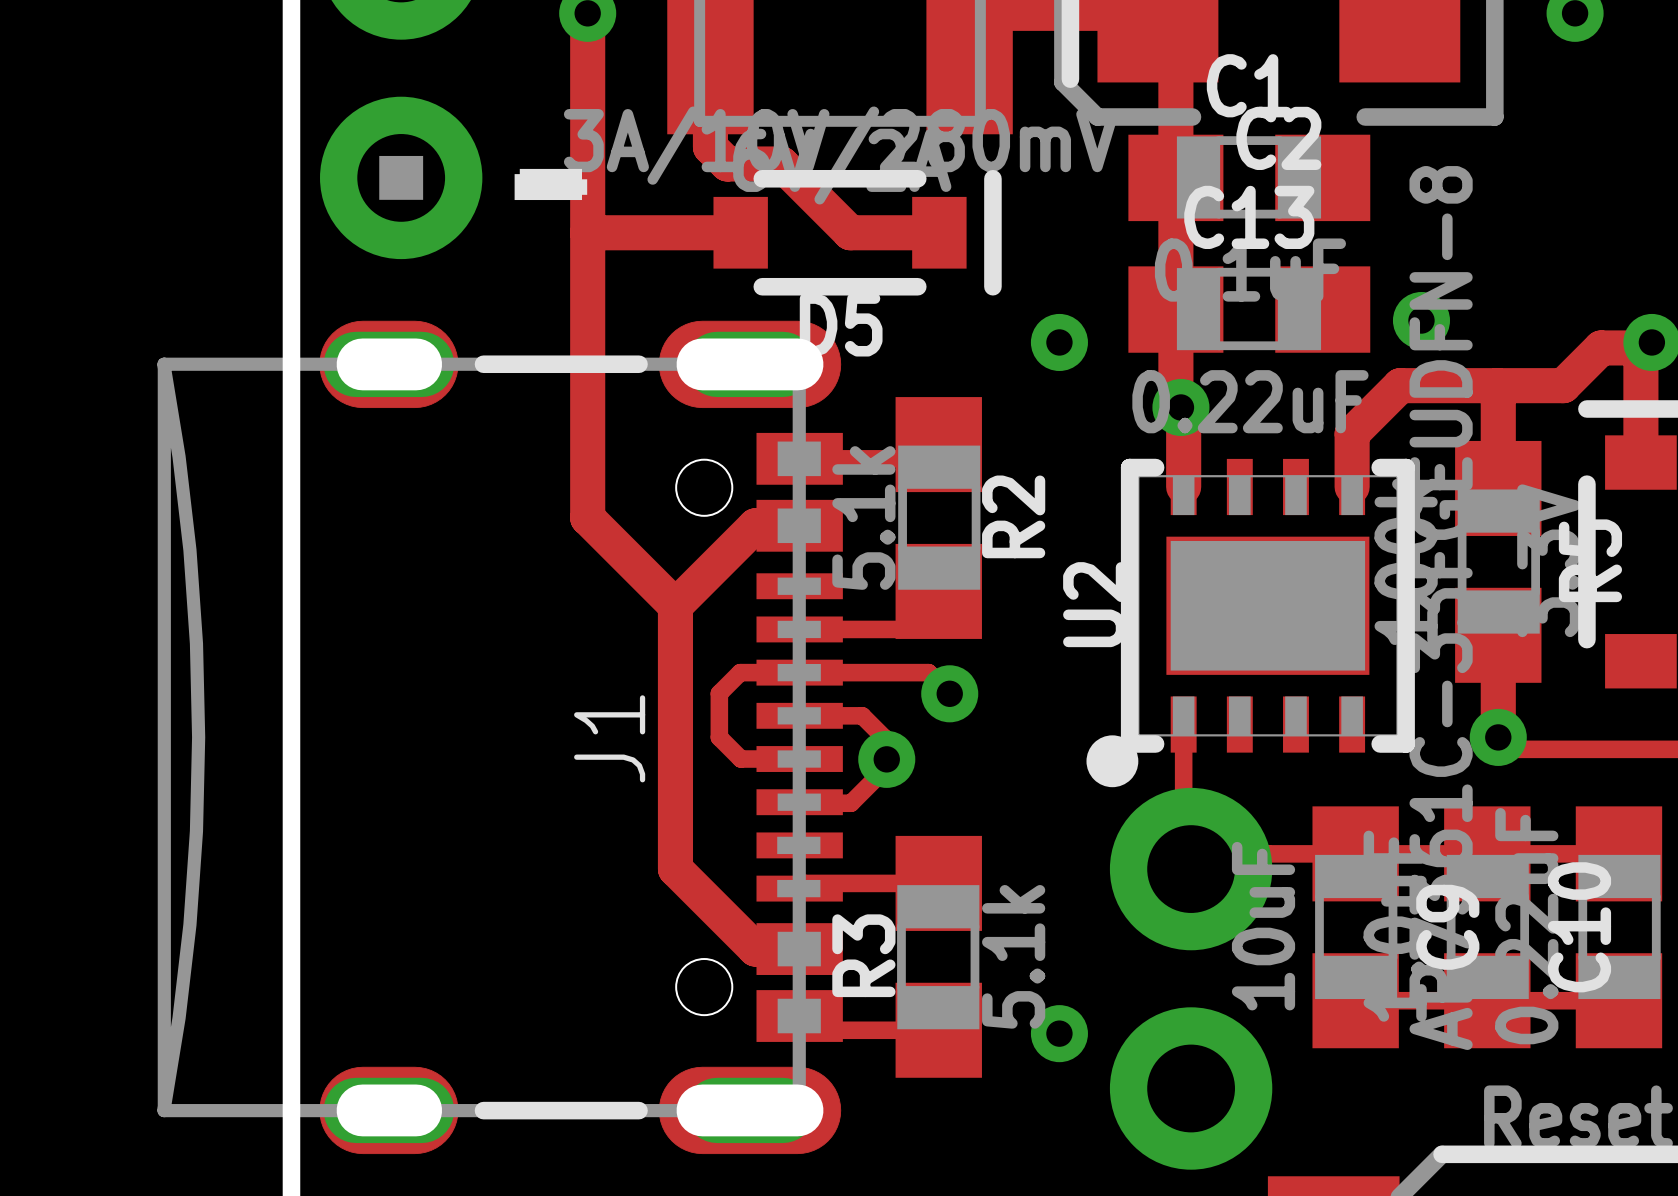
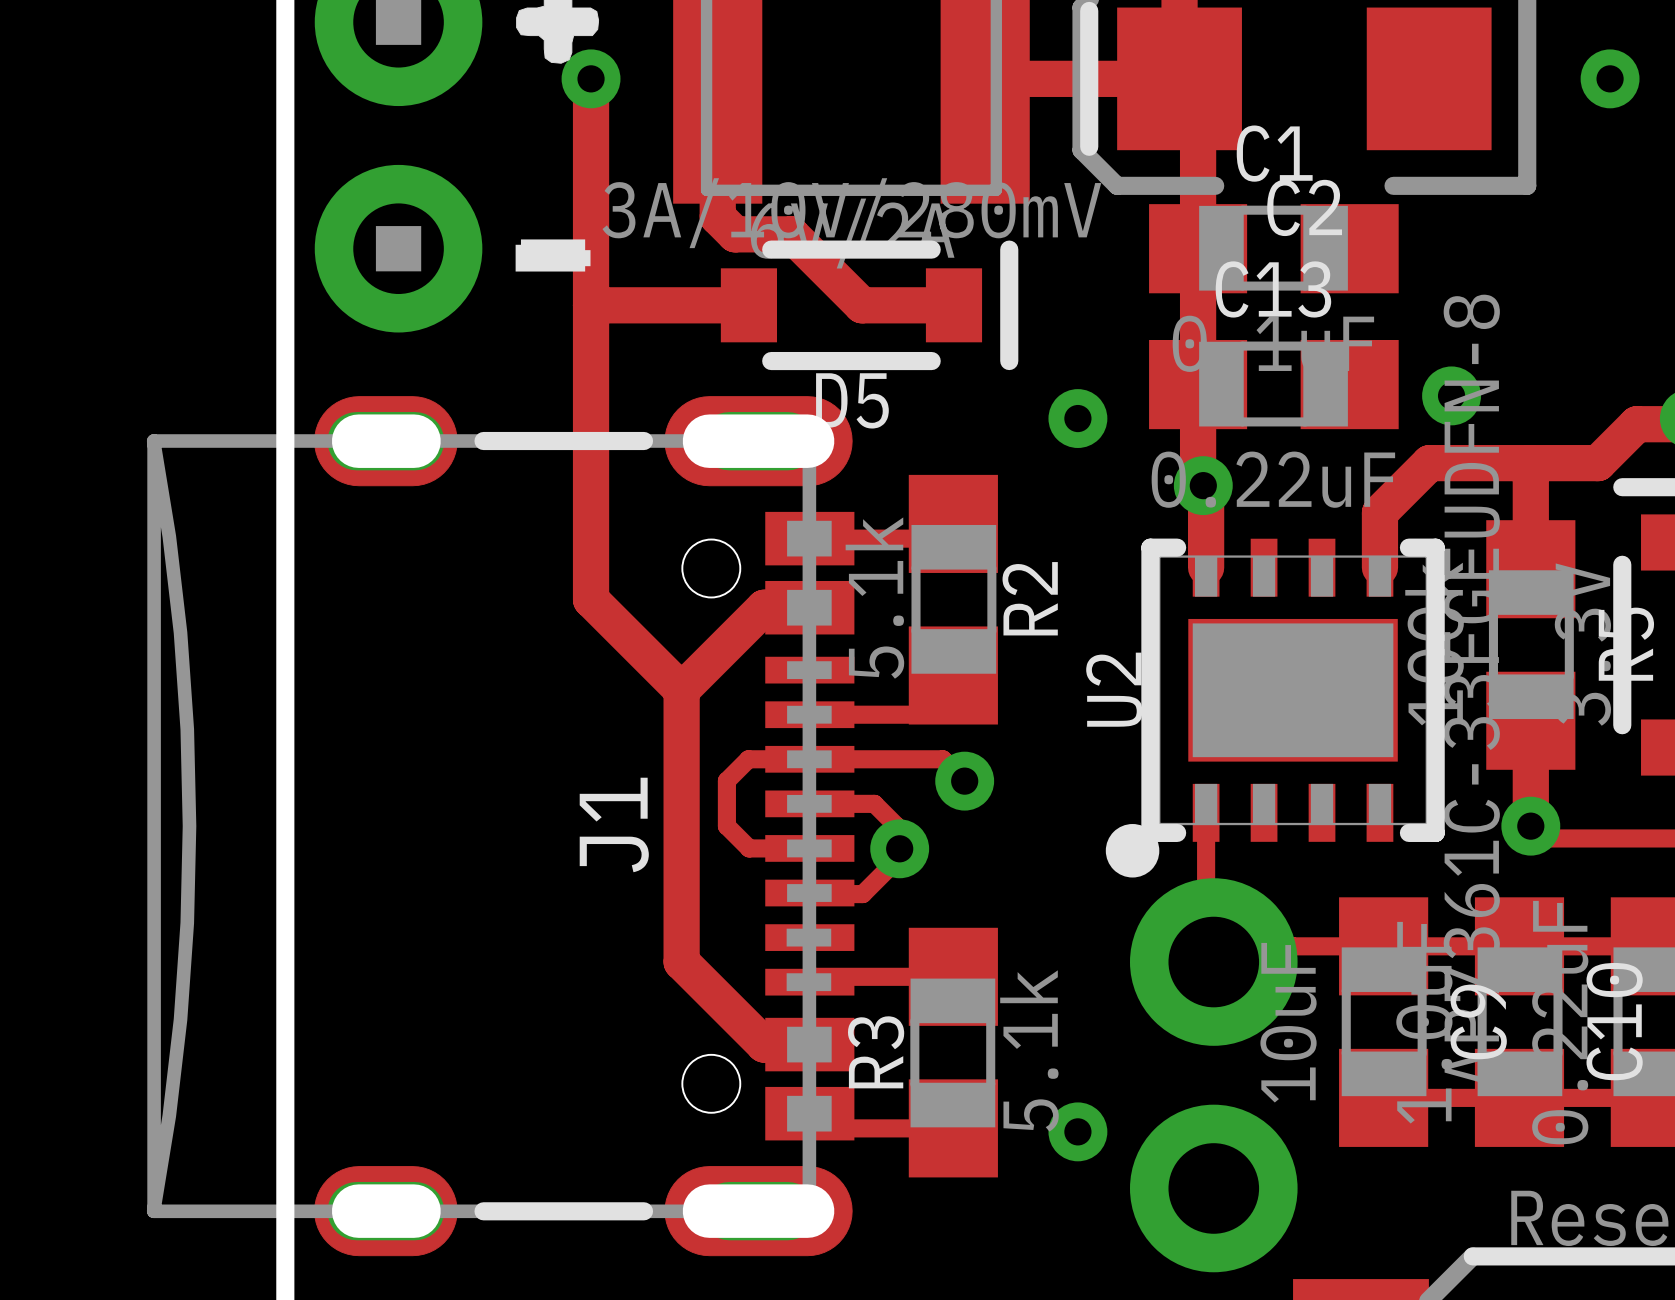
J1 footprint: [157, 320, 843, 1155] -> [146, 396, 855, 1257]

